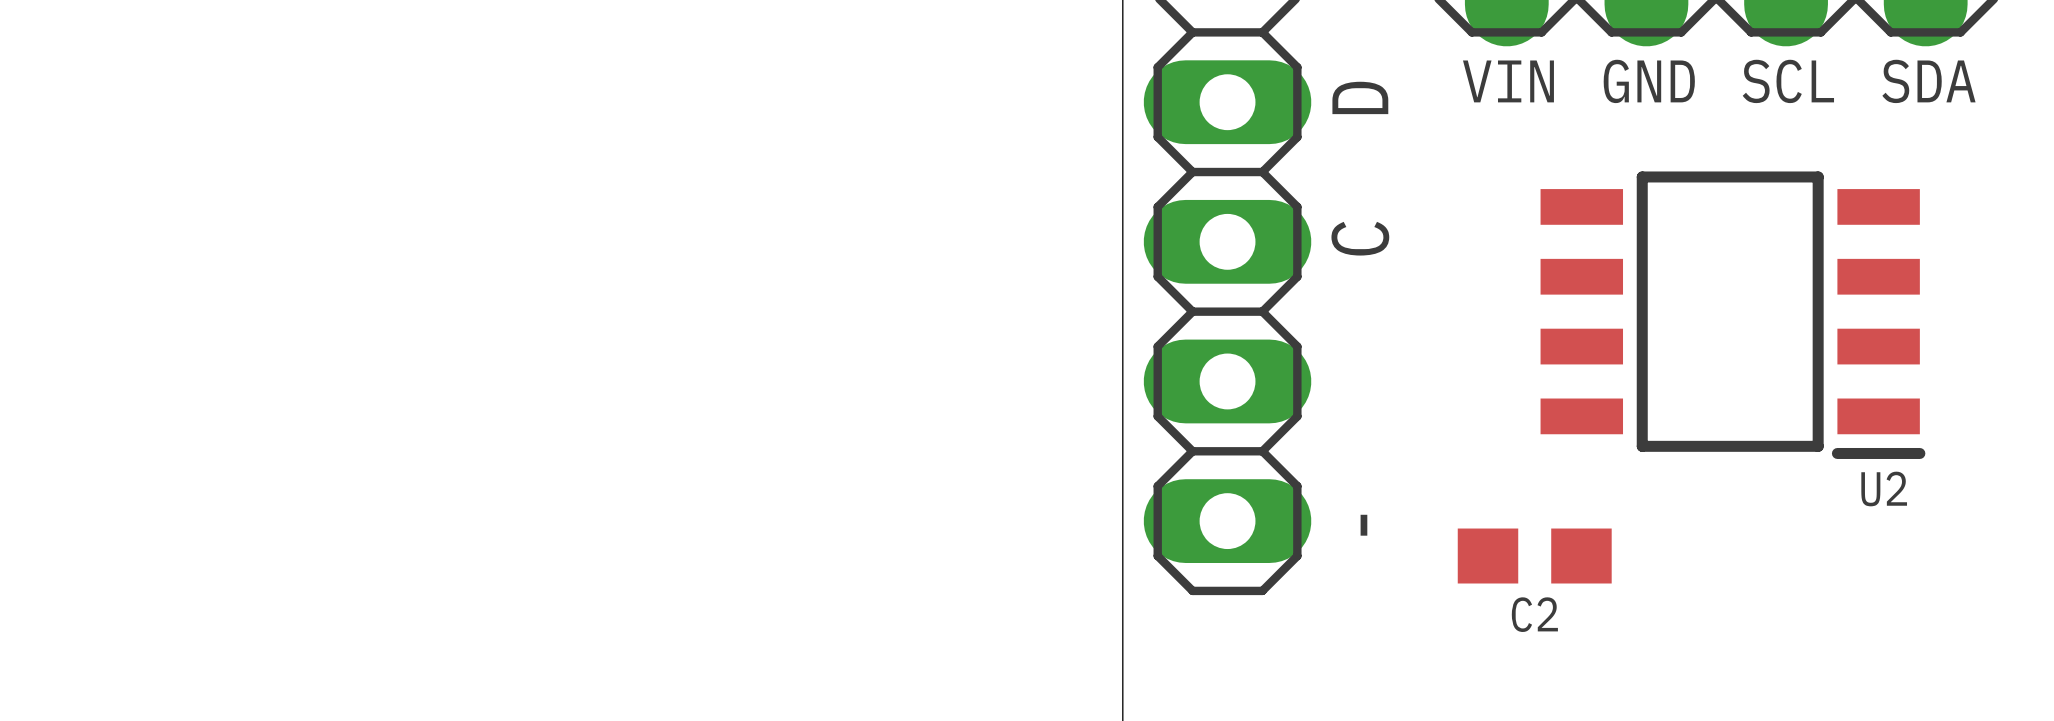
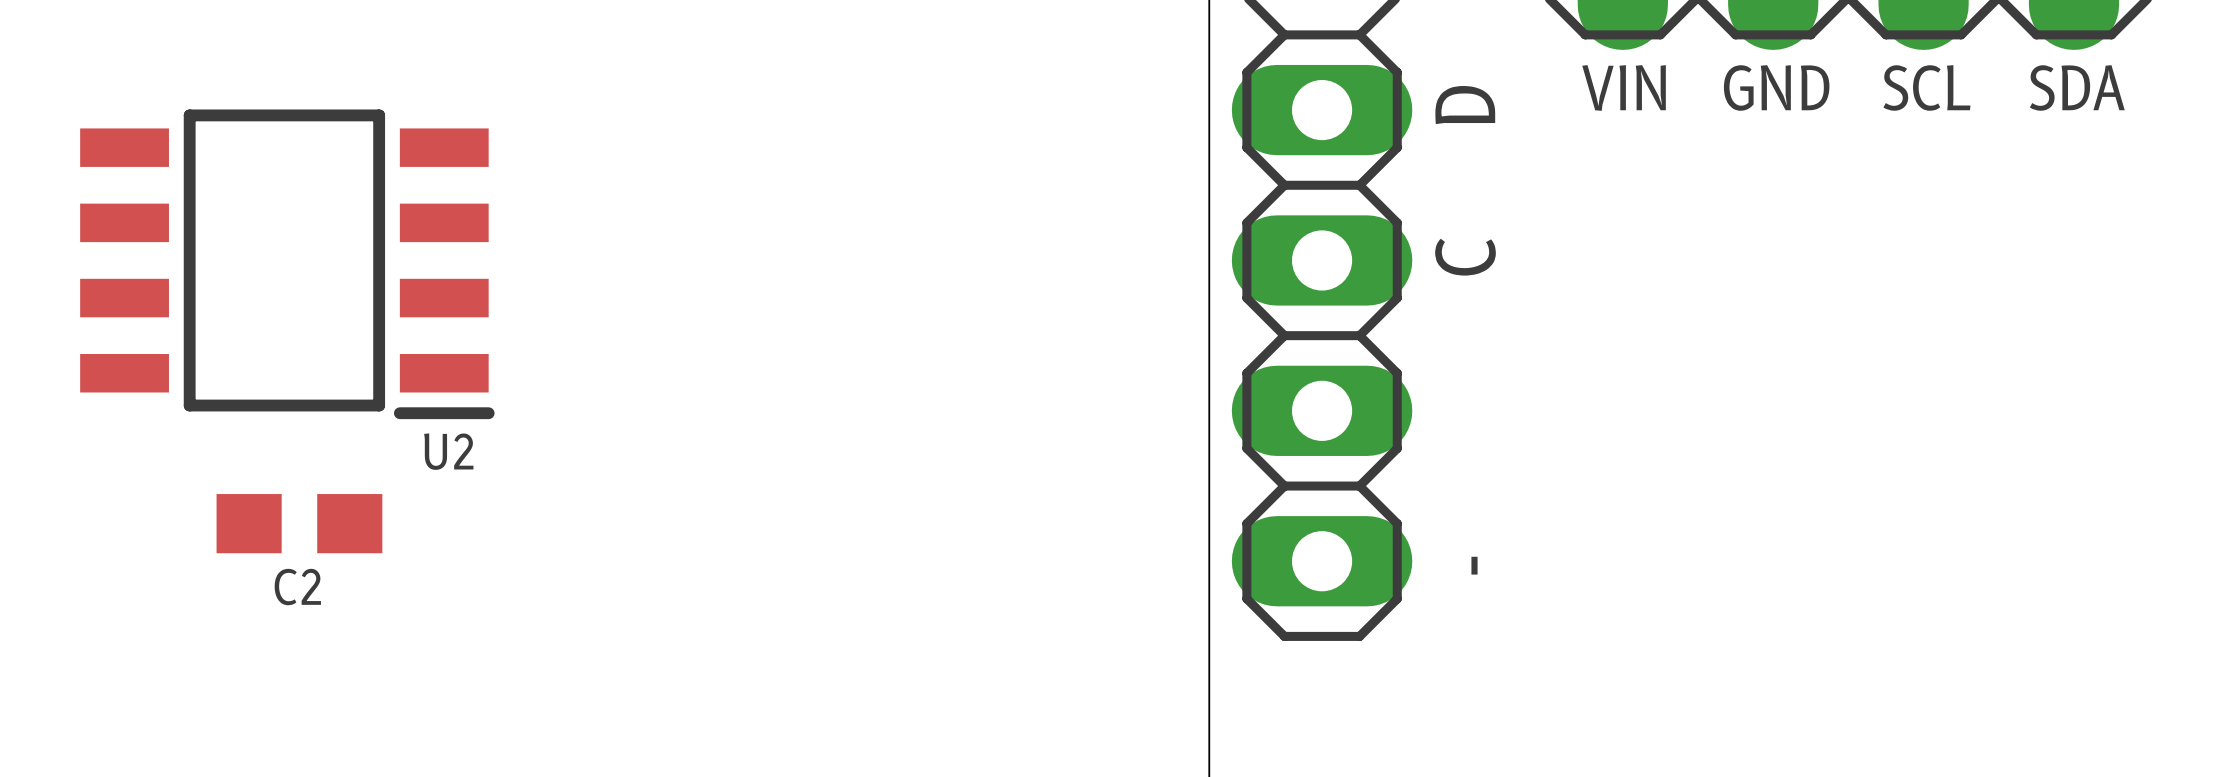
U2 position: (1732, 315) -> (287, 264)
C2 position: (1534, 556) -> (299, 523)

